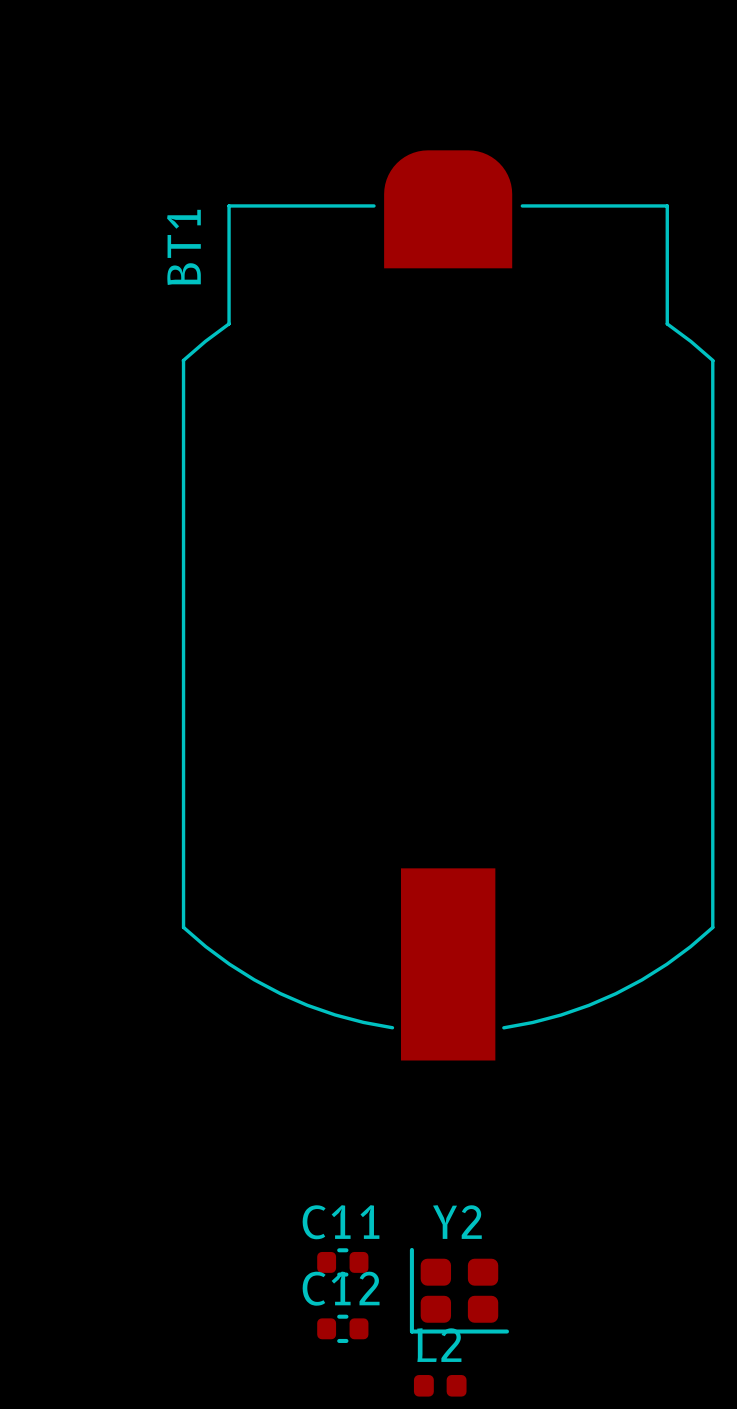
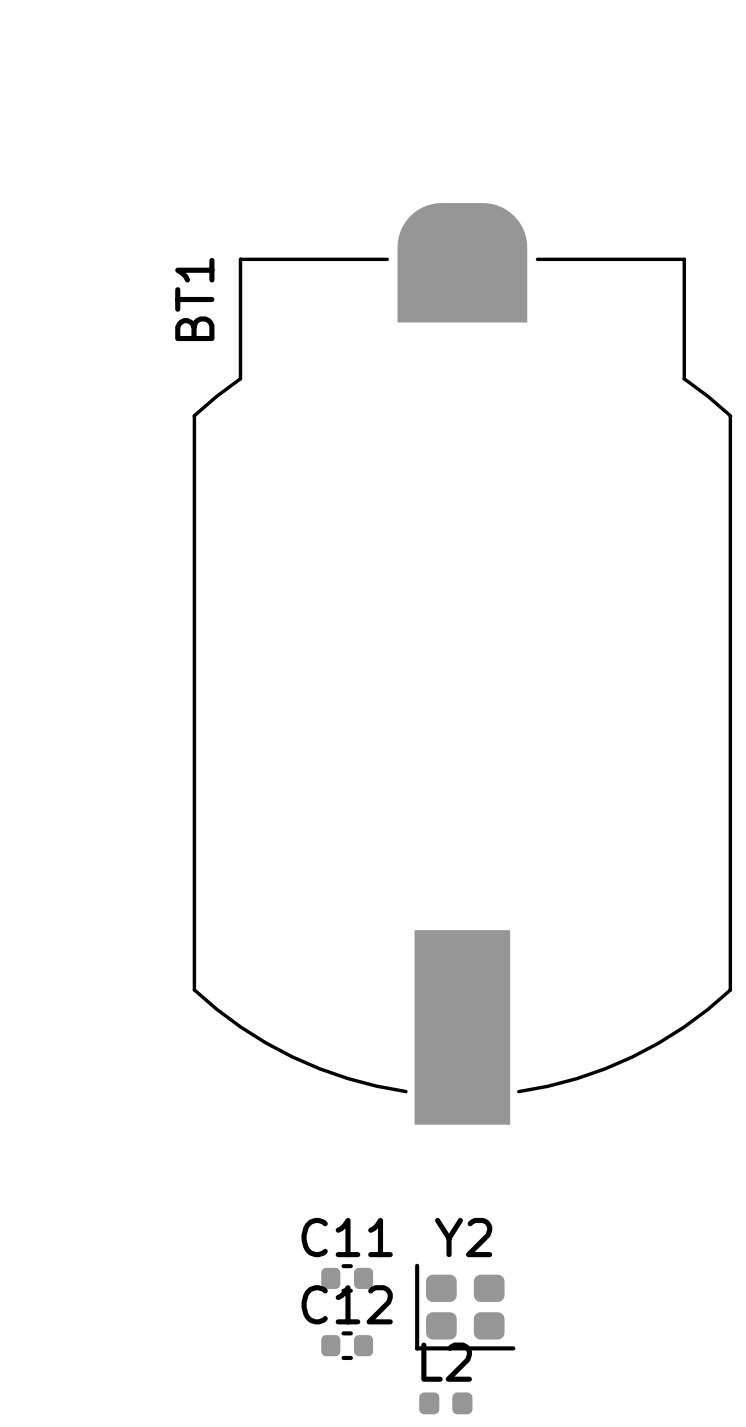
BT1 position: (448, 605) -> (462, 663)

